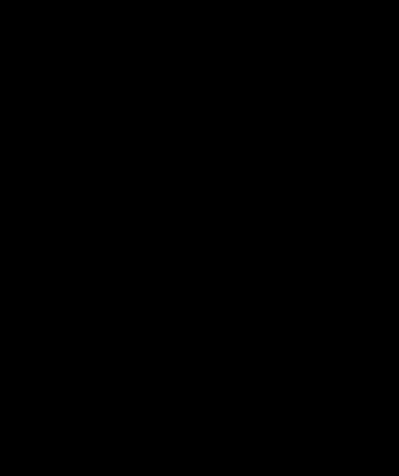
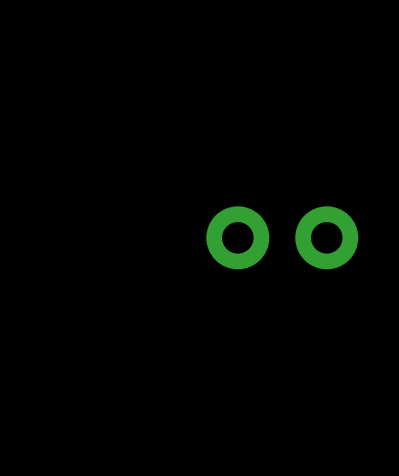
part: none -> (282, 237)

